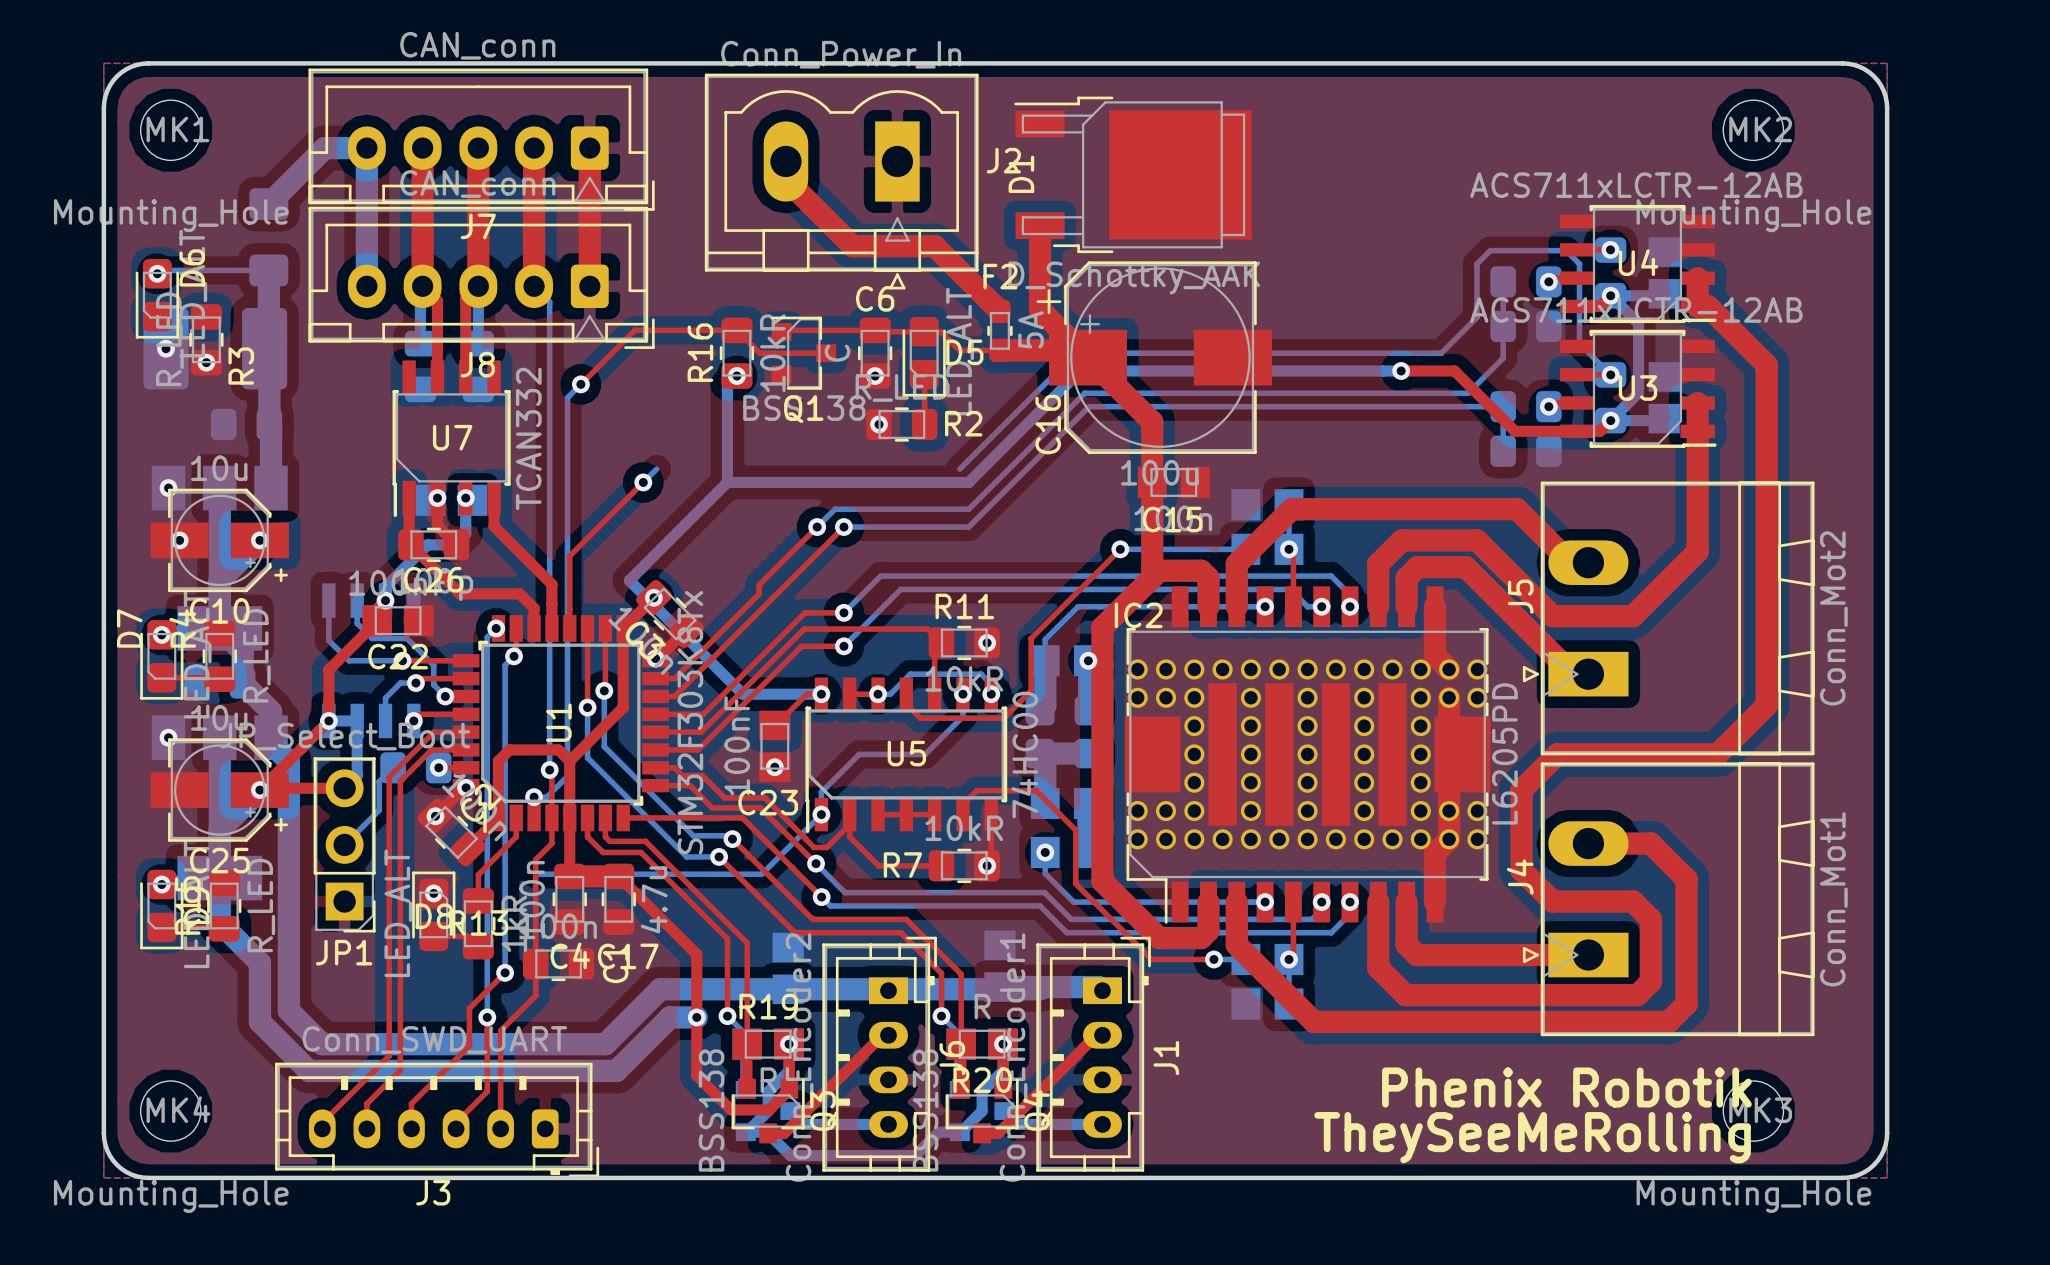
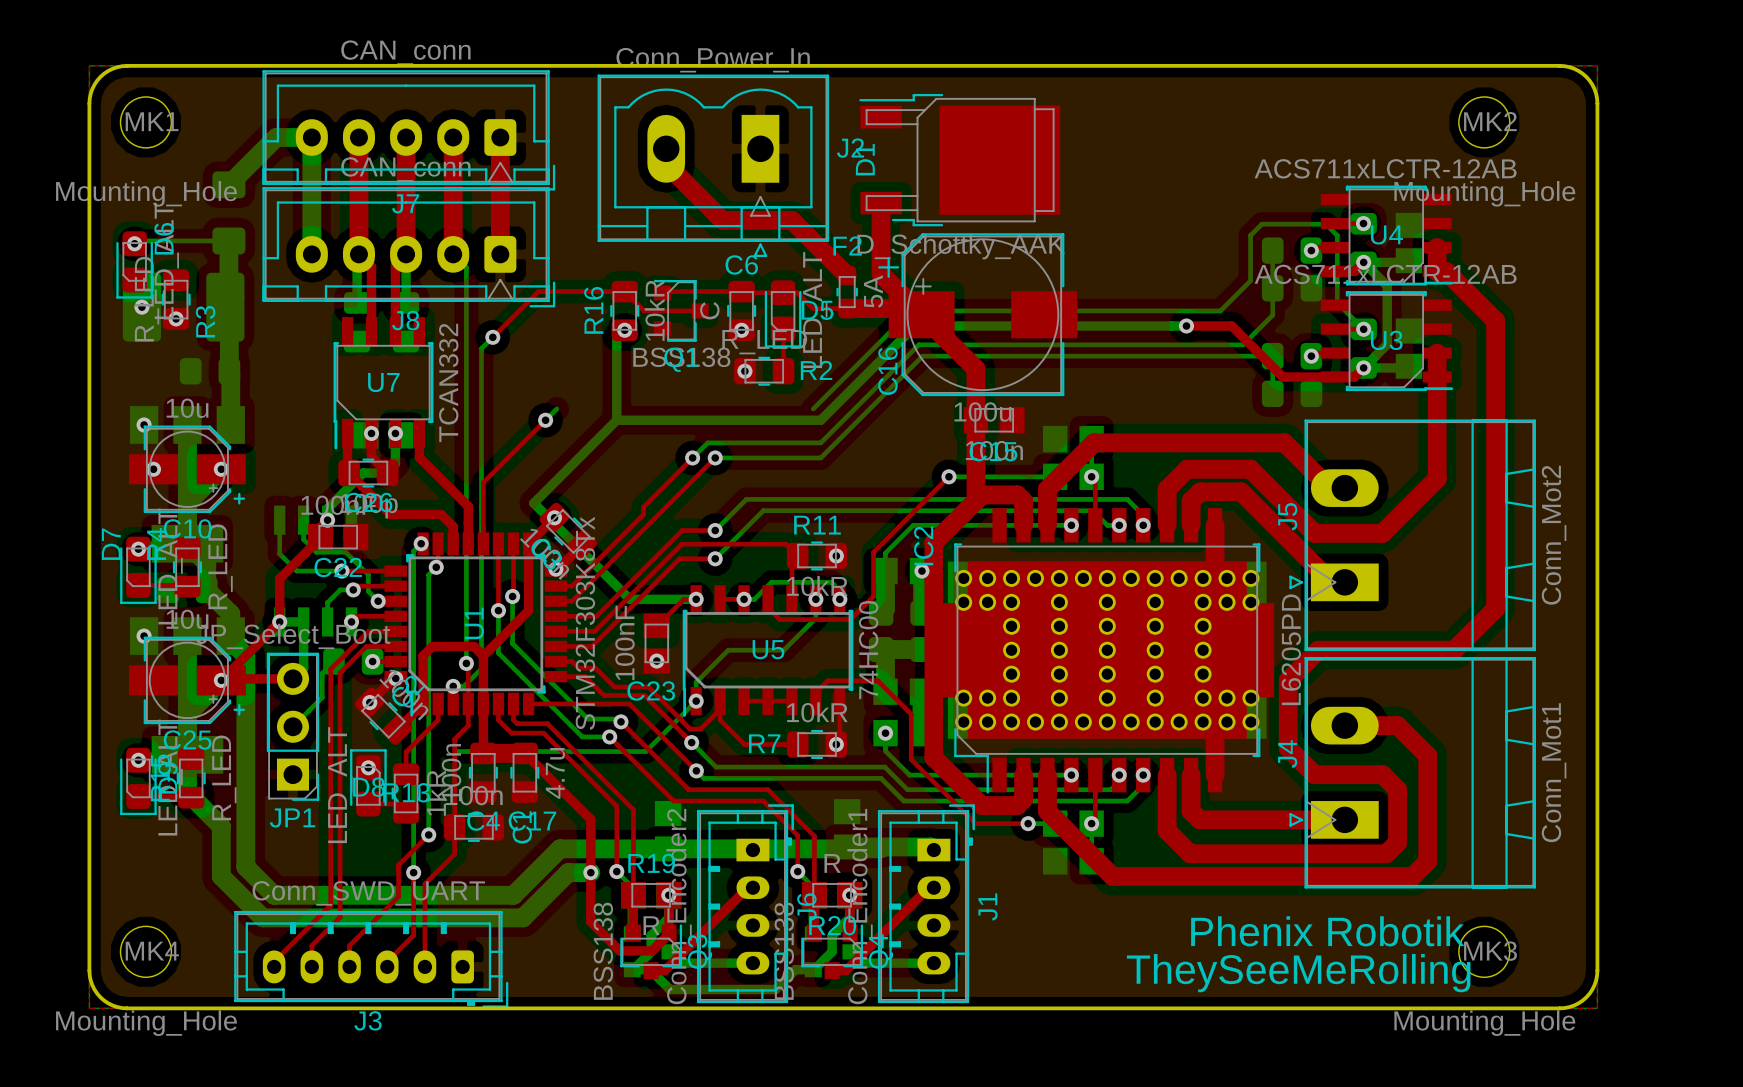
IC2 footprint: [1124, 586, 1491, 924] -> [940, 508, 1275, 794]
IC2 name position: IC2 (1138, 615) -> IC2 (923, 545)

